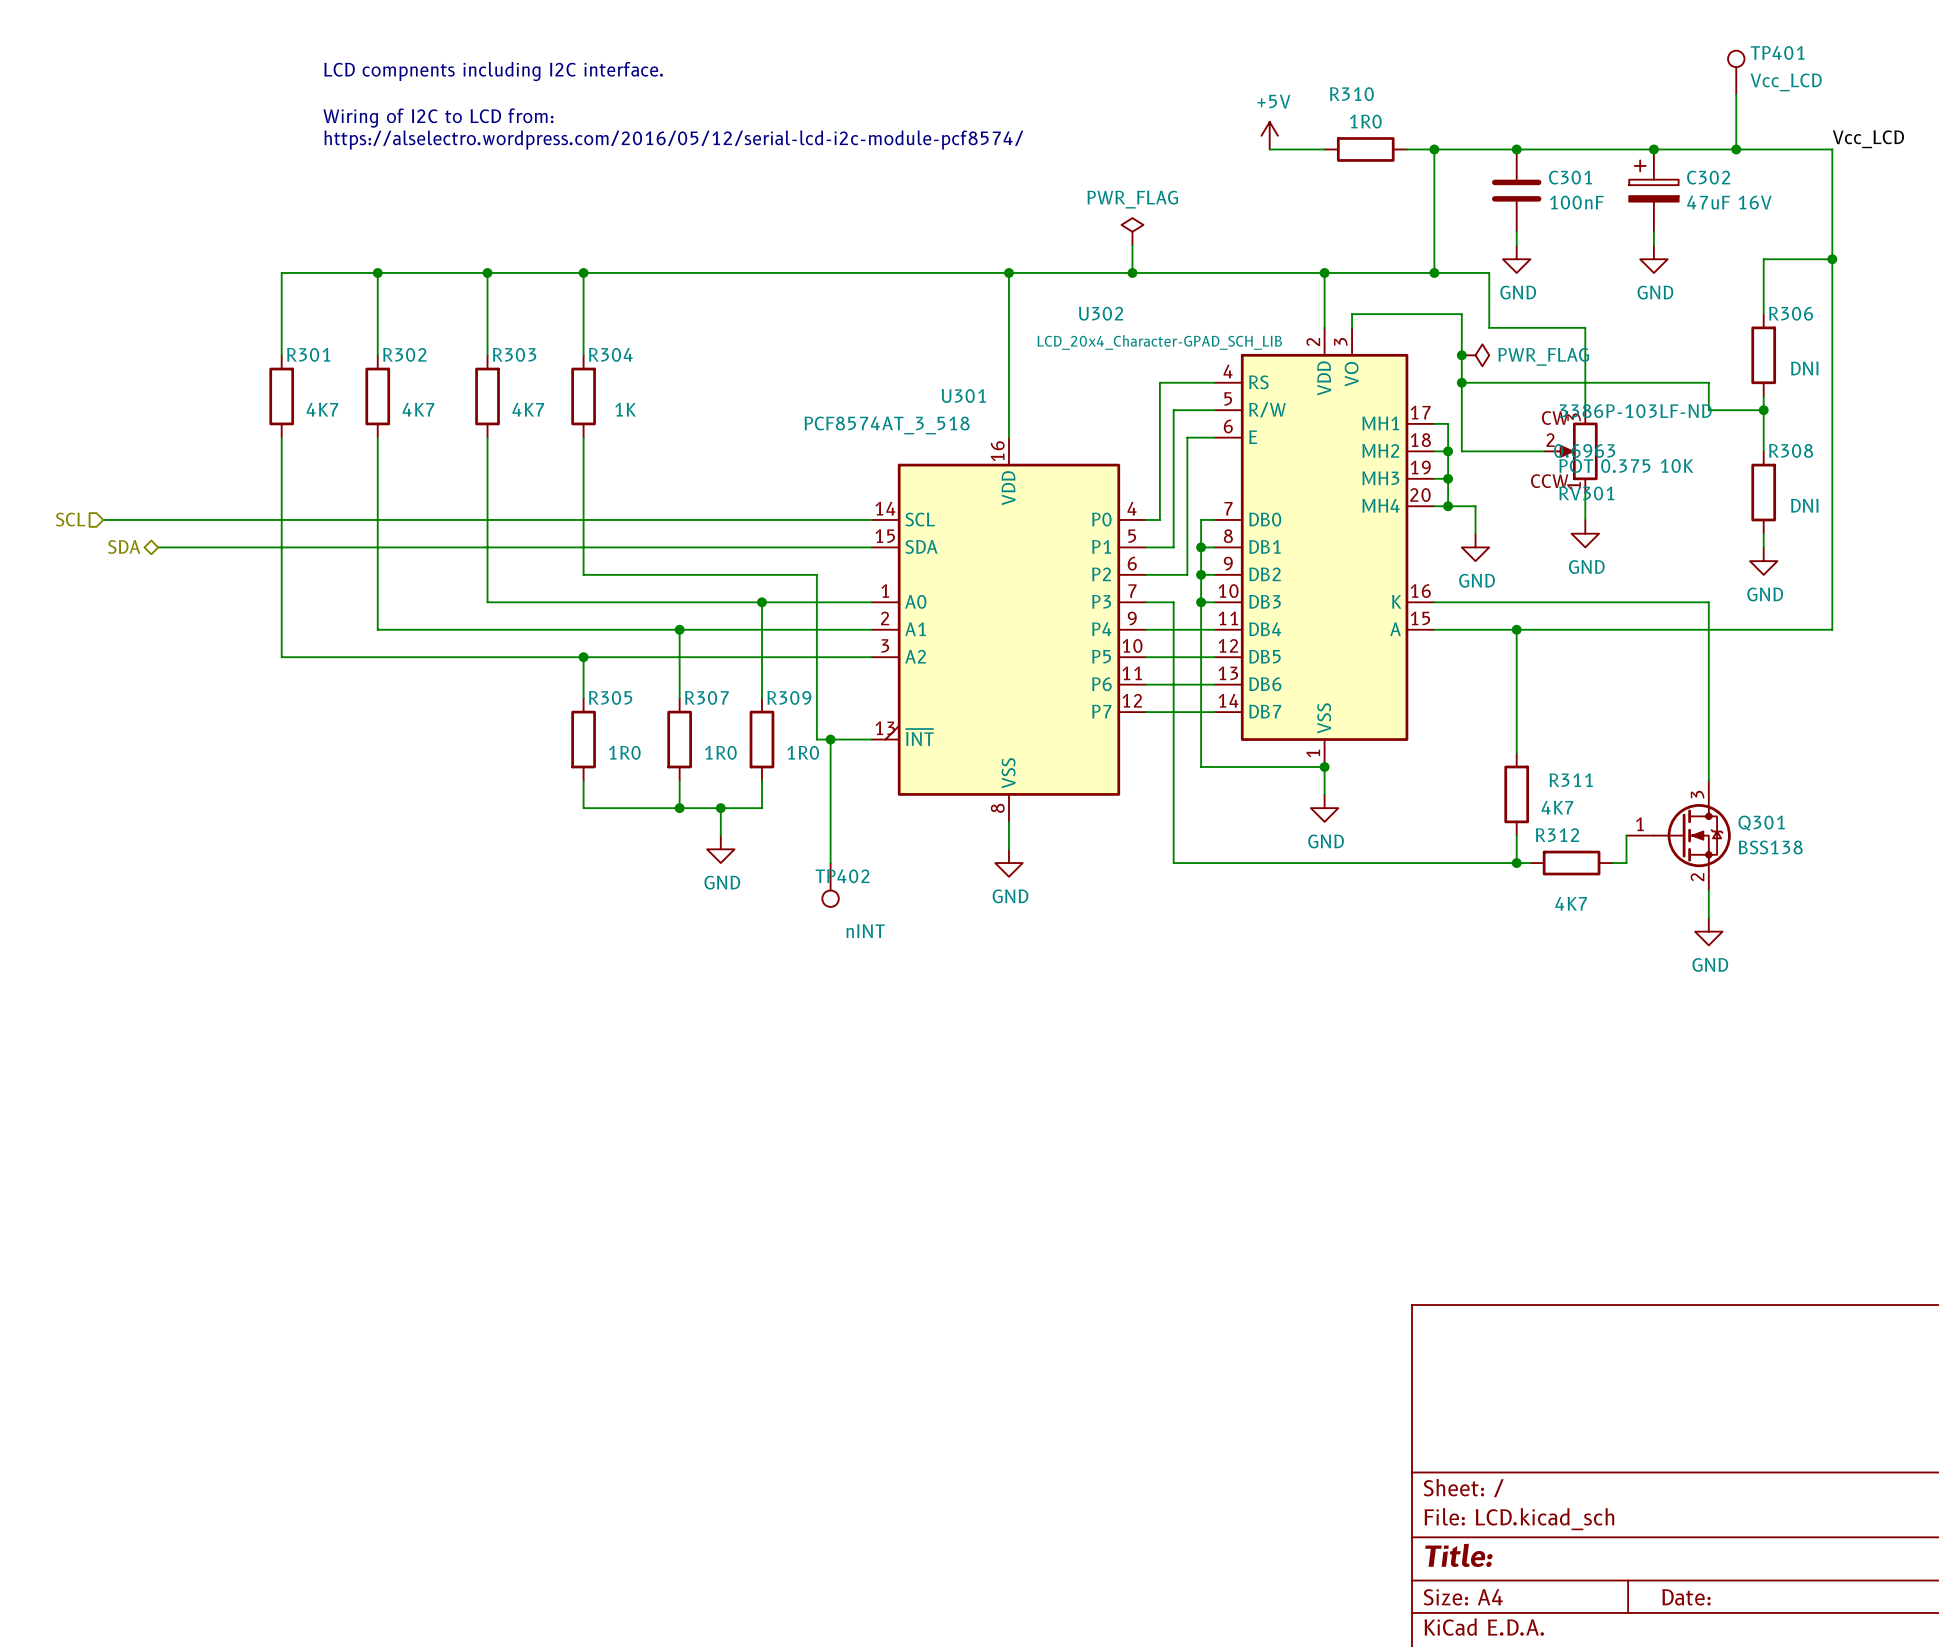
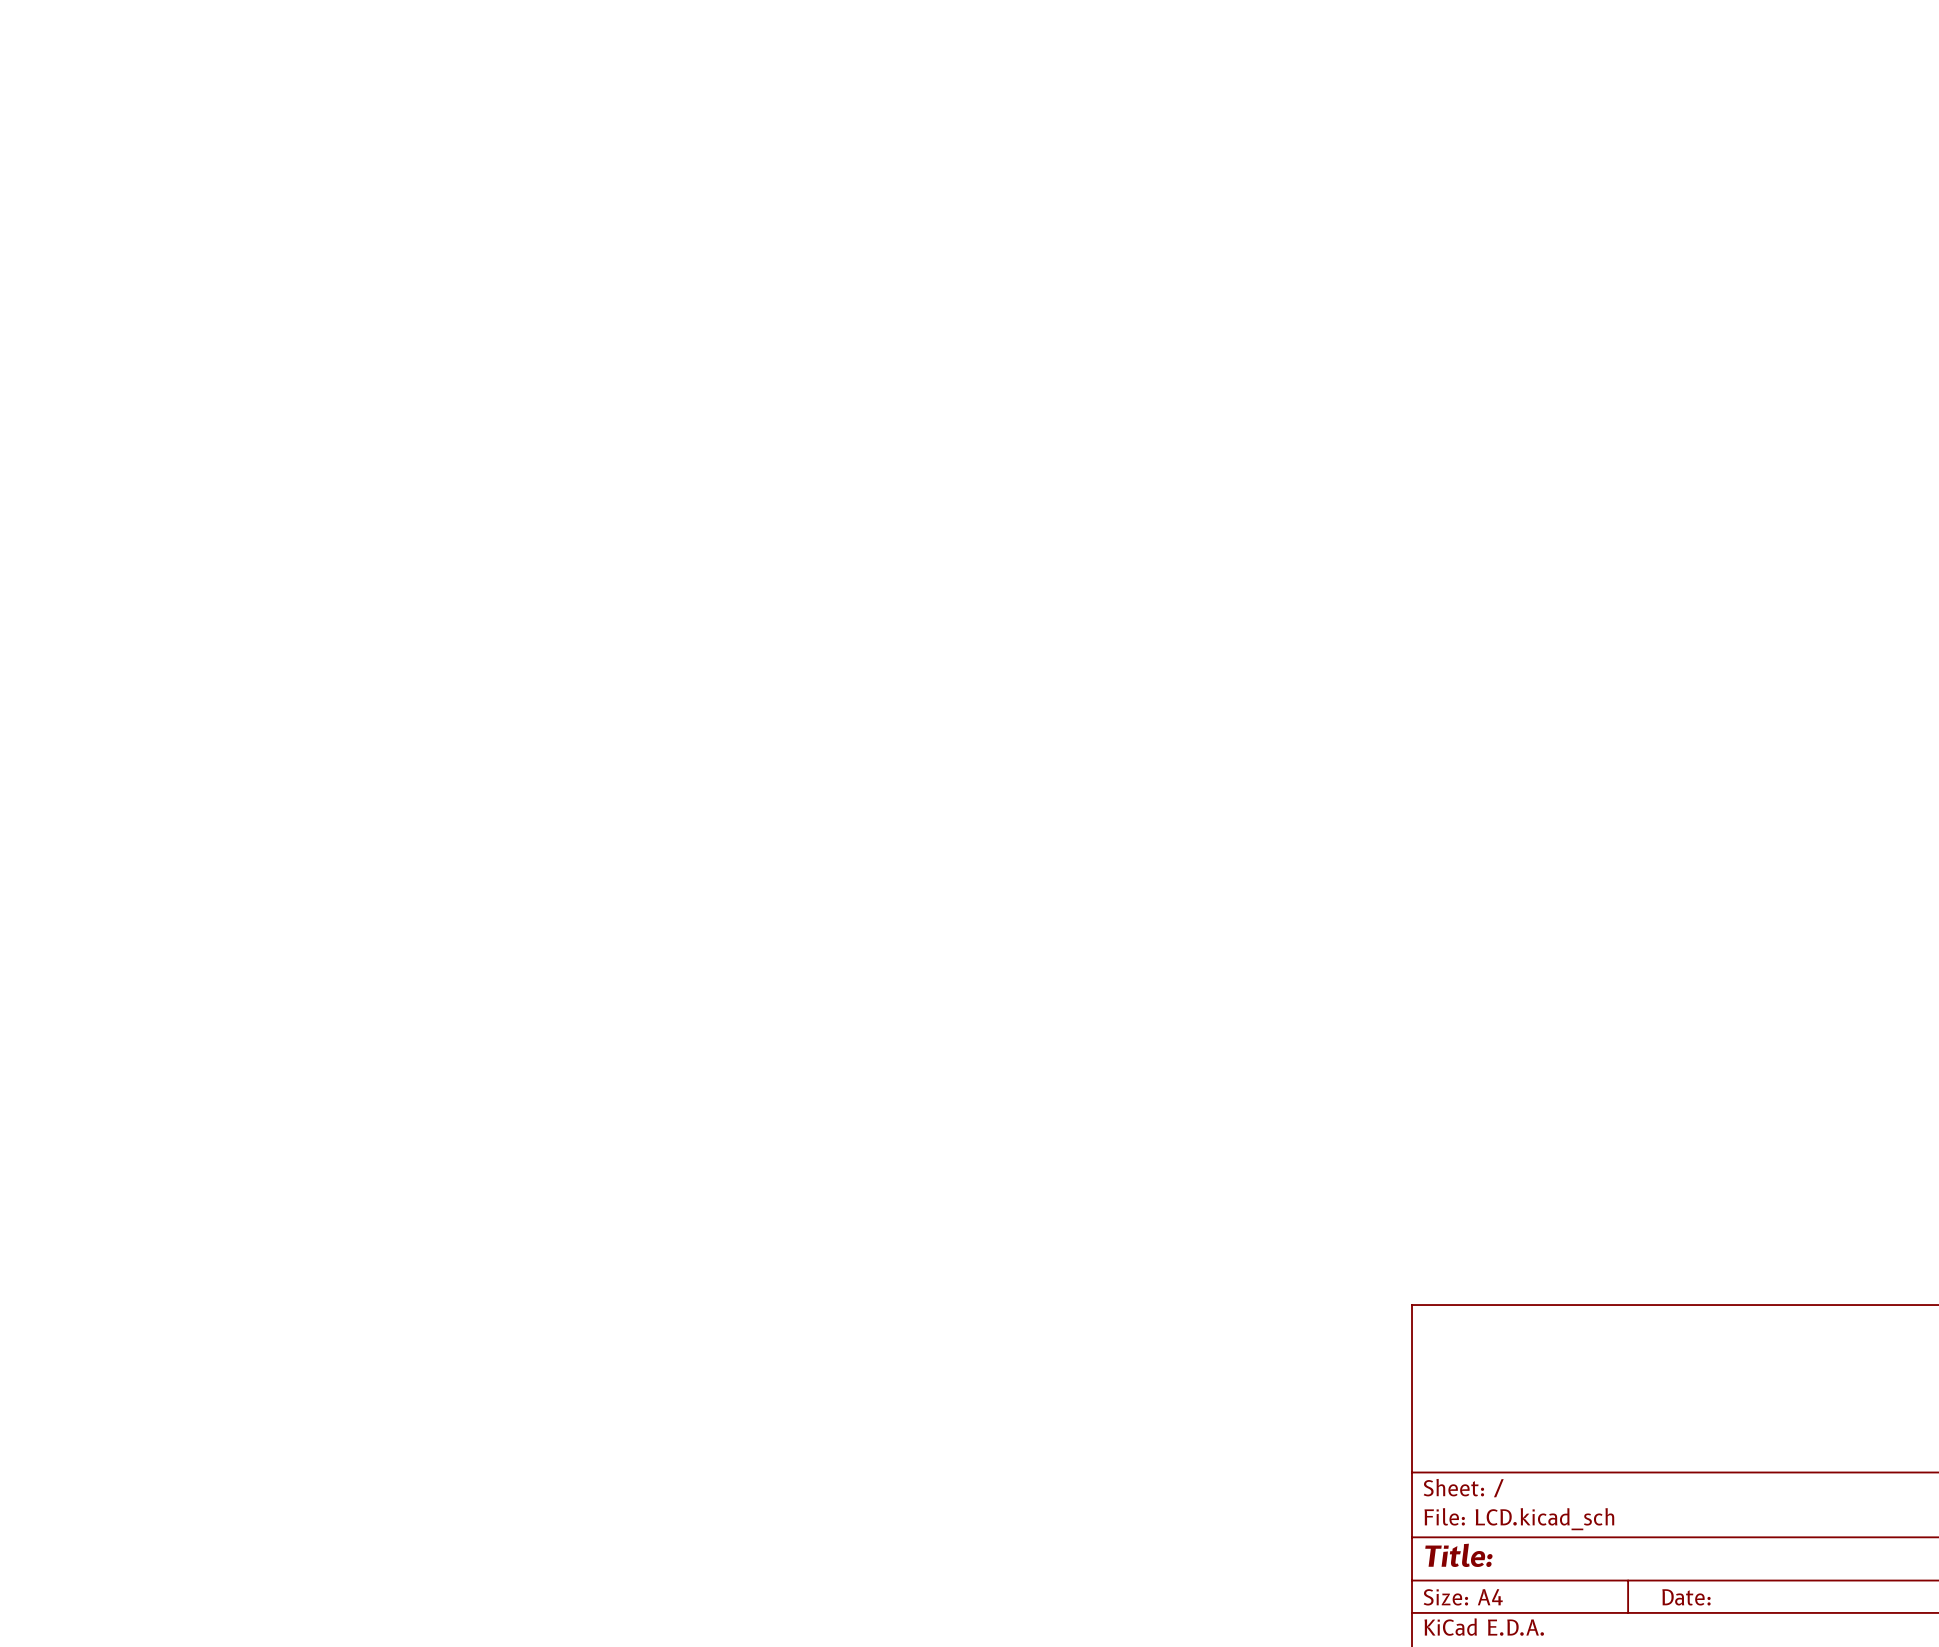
text: LCD compnents including I2C interface. (493, 71) -> none
TP401: Vcc_LCD (1736, 72) -> none
wire: (1736, 94) (1736, 149) -> none
text: Wiring of I2C to LCD from: (438, 118) -> none
power symbol: +5V (1269, 135) -> none
label: Vcc_LCD (1868, 139) -> none
text: https://alselectro.wordpress.com/2016/05/12/serial-lcd-i2c-module-pcf8574/ (673, 140) -> none
wire: (1269, 149) (1324, 149) -> none
R310: 1R0 (1365, 149) -> none
wire: (1406, 149) (1832, 149) (1832, 629) (1434, 629) -> none
wire: (1434, 149) (1434, 272) -> none
junction: (1434, 149) -> none
junction: (1516, 149) -> none
junction: (1653, 149) -> none
junction: (1736, 149) -> none
C301: 100nF (1516, 190) -> none
C302: 47uF 16V (1653, 190) -> none
power symbol: PWR_FLAG (1132, 231) -> none
wire: (1516, 231) (1516, 245) -> none
wire: (1653, 231) (1653, 245) -> none
wire: (1132, 245) (1132, 272) -> none
power symbol: GND (1516, 259) -> none
power symbol: GND (1653, 259) -> none
wire: (1832, 259) (1763, 259) (1763, 314) -> none
junction: (1832, 259) -> none
wire: (377, 272) (377, 355) -> none
junction: (377, 272) -> none
wire: (487, 272) (487, 355) -> none
junction: (487, 272) -> none
wire: (583, 272) (583, 355) -> none
junction: (583, 272) -> none
wire: (1008, 272) (1008, 437) -> none
junction: (1008, 272) -> none
junction: (1132, 272) -> none
wire: (1324, 272) (1324, 327) -> none
junction: (1324, 272) -> none
junction: (1434, 272) -> none
wire: (1352, 327) (1352, 314) (1461, 314) (1461, 451) (1544, 451) -> none
wire: (281, 355) (281, 272) (1489, 272) (1489, 327) (1585, 327) (1585, 410) -> none
junction: (1461, 355) -> none
power symbol: PWR_FLAG (1475, 355) -> none
R306: DNI (1763, 355) -> none
wire: (1214, 382) (1159, 382) (1159, 519) (1146, 519) -> none
wire: (1461, 382) (1708, 382) (1708, 410) (1763, 410) -> none
junction: (1461, 382) -> none
R301: 4K7 (281, 396) -> none
R302: 4K7 (377, 396) -> none
R303: 4K7 (487, 396) -> none
R304: 1K (583, 396) -> none
wire: (1763, 396) (1763, 451) -> none
wire: (1214, 410) (1173, 410) (1173, 547) (1146, 547) -> none
junction: (1763, 410) -> none
wire: (1434, 423) (1448, 423) (1448, 506) -> none
wire: (281, 437) (281, 657) (871, 657) -> none
wire: (377, 437) (377, 629) (871, 629) -> none
wire: (487, 437) (487, 602) (871, 602) -> none
wire: (583, 437) (583, 574) (816, 574) (816, 739) (871, 739) -> none
wire: (1214, 437) (1187, 437) (1187, 574) (1146, 574) -> none
wire: (1434, 451) (1448, 451) -> none
junction: (1448, 451) -> none
RV301: POT 0.375 10K (1570, 451) -> none
wire: (1434, 478) (1448, 478) -> none
junction: (1448, 478) -> none
wire: (1585, 492) (1585, 519) -> none
R308: DNI (1763, 492) -> none
wire: (1434, 506) (1475, 506) (1475, 533) -> none
junction: (1448, 506) -> none
hierarchical label: SCL (70, 519) -> none
wire: (103, 519) (871, 519) -> none
wire: (1214, 519) (1201, 519) (1201, 766) (1324, 766) (1324, 794) -> none
power symbol: GND (1585, 533) -> none
wire: (1763, 533) (1763, 547) -> none
hierarchical label: SDA (124, 546) -> none
wire: (158, 547) (871, 547) -> none
wire: (1201, 547) (1214, 547) -> none
junction: (1201, 547) -> none
U302: LCD_20x4_Character-GPAD_SCH_LIB (1324, 547) -> none
power symbol: GND (1475, 547) -> none
power symbol: GND (1763, 561) -> none
wire: (1201, 574) (1214, 574) -> none
junction: (1201, 574) -> none
wire: (761, 602) (761, 698) -> none
junction: (761, 602) -> none
wire: (1146, 602) (1173, 602) (1173, 863) (1530, 863) -> none
wire: (1201, 602) (1214, 602) -> none
junction: (1201, 602) -> none
wire: (1434, 602) (1708, 602) (1708, 780) -> none
wire: (679, 629) (679, 698) -> none
junction: (679, 629) -> none
U301: PCF8574AT_3_518 (1008, 629) -> none
wire: (1146, 629) (1214, 629) -> none
wire: (1516, 629) (1516, 753) -> none
junction: (1516, 629) -> none
wire: (583, 657) (583, 698) -> none
junction: (583, 657) -> none
wire: (1146, 657) (1214, 657) -> none
wire: (1146, 684) (1214, 684) -> none
wire: (1146, 712) (1214, 712) -> none
R305: 1R0 (583, 739) -> none
R307: 1R0 (679, 739) -> none
R309: 1R0 (761, 739) -> none
wire: (830, 739) (830, 863) -> none
junction: (830, 739) -> none
junction: (1324, 766) -> none
wire: (583, 780) (583, 808) (761, 808) (761, 780) -> none
wire: (679, 780) (679, 808) -> none
R311: 4K7 (1516, 794) -> none
junction: (679, 808) -> none
wire: (720, 808) (720, 835) -> none
junction: (720, 808) -> none
power symbol: GND (1324, 808) -> none
wire: (1008, 821) (1008, 849) -> none
wire: (1516, 835) (1516, 863) -> none
wire: (1626, 835) (1626, 863) (1612, 863) -> none
Q301: BSS138 (1678, 835) -> none
power symbol: GND (720, 849) -> none
power symbol: GND (1008, 863) -> none
junction: (1516, 863) -> none
R312: 4K7 (1571, 863) -> none
TP402: nINT (830, 884) -> none
wire: (1708, 890) (1708, 917) -> none
power symbol: GND (1708, 931) -> none

